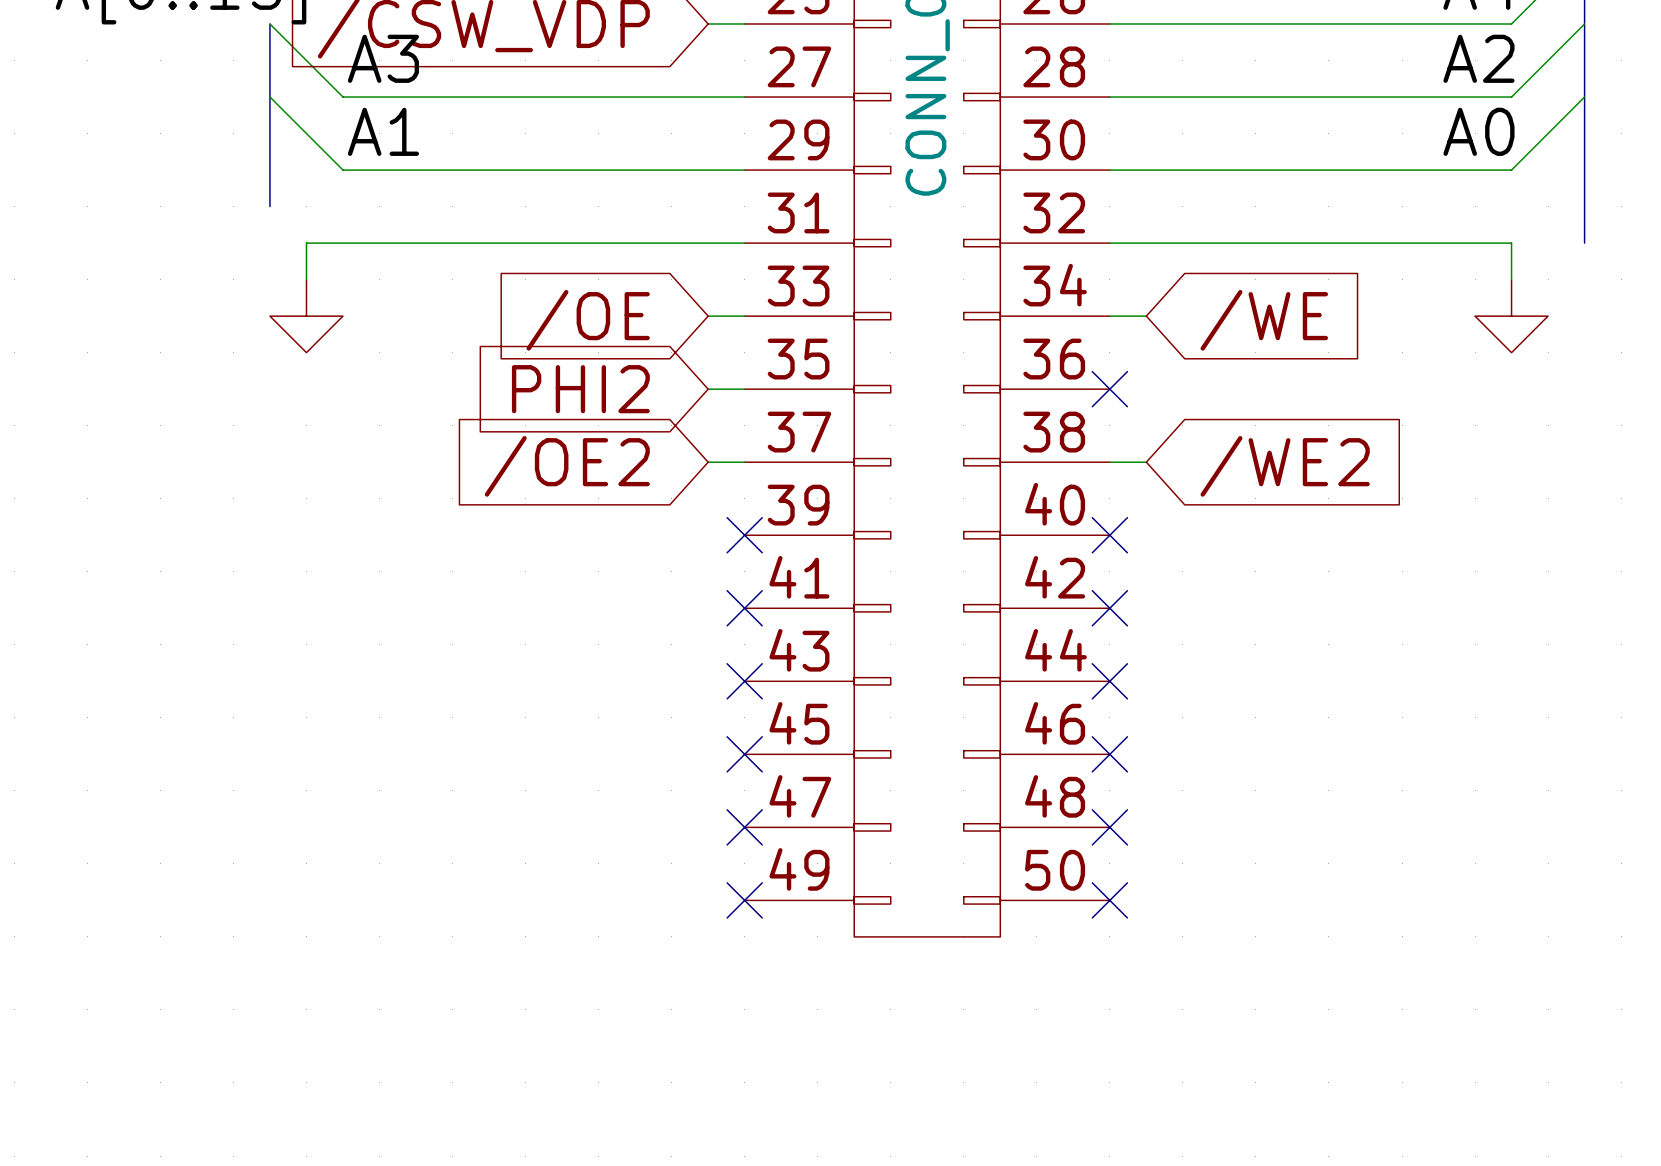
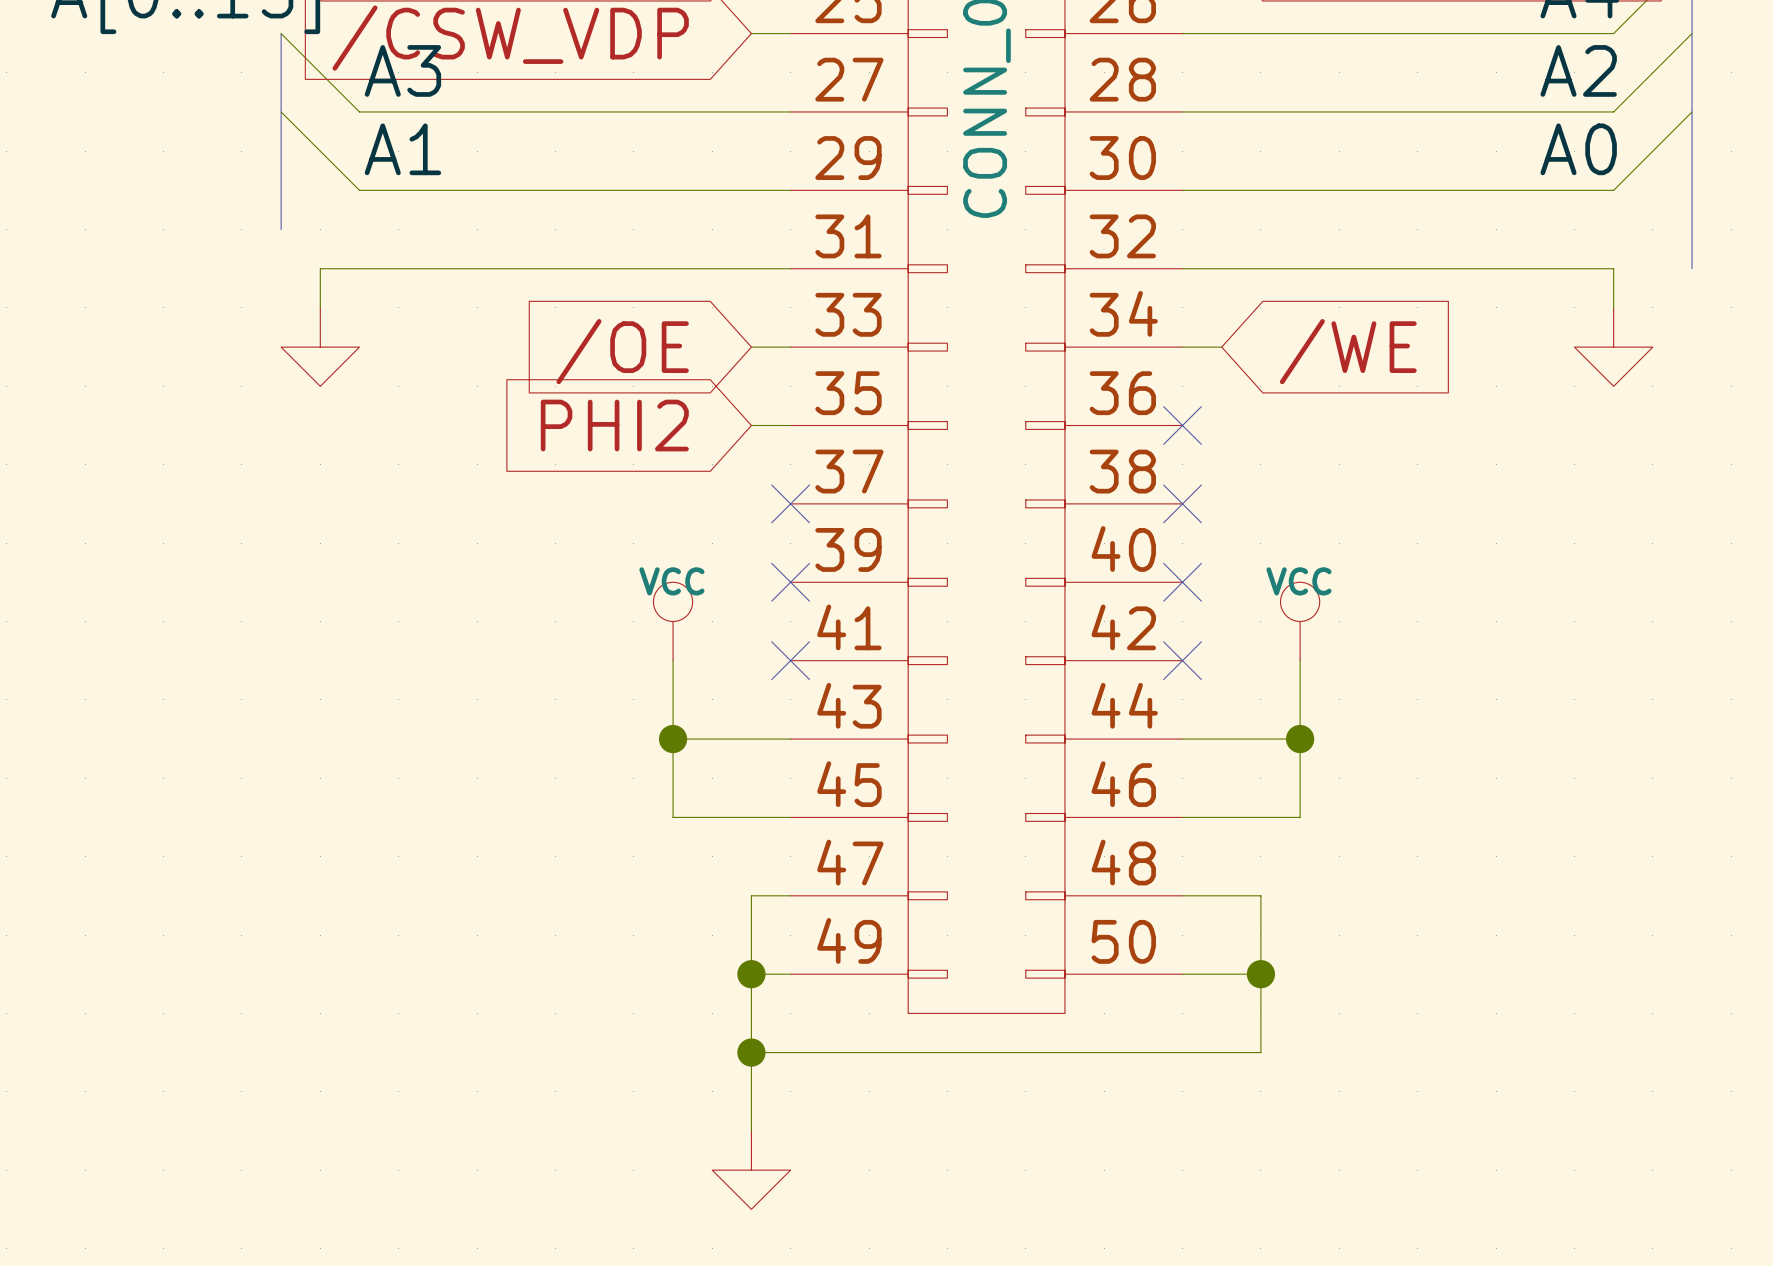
wire: (708, 462) (744, 462) -> (751, 974) (790, 974)
no-connect mark: none -> (790, 503)
wire: (1109, 462) (1146, 462) -> none
no-connect mark: none -> (1182, 503)
global label: /OE2 (567, 466) -> none
global label: /WE2 (1285, 466) -> none
power symbol: none -> VCC (673, 621)
power symbol: none -> VCC (1300, 621)
wire: none -> (673, 660) (673, 817) (790, 817)
wire: none -> (1300, 660) (1300, 817) (1182, 817)
wire: none -> (673, 739) (790, 739)
junction: none -> (673, 739)
no-connect mark: (744, 681) -> none
wire: none -> (1182, 739) (1300, 739)
no-connect mark: (1109, 681) -> none
junction: none -> (1300, 739)
no-connect mark: (744, 754) -> none
no-connect mark: (1109, 754) -> none
wire: none -> (790, 895) (751, 895) (751, 1130)
no-connect mark: (744, 827) -> none
wire: none -> (1182, 895) (1260, 895) (1260, 1052) (751, 1052)
no-connect mark: (1109, 827) -> none
junction: none -> (751, 974)
no-connect mark: (744, 900) -> none
wire: none -> (1182, 974) (1260, 974)
no-connect mark: (1109, 900) -> none
junction: none -> (1260, 974)
junction: none -> (751, 1052)
power symbol: none -> (751, 1170)

